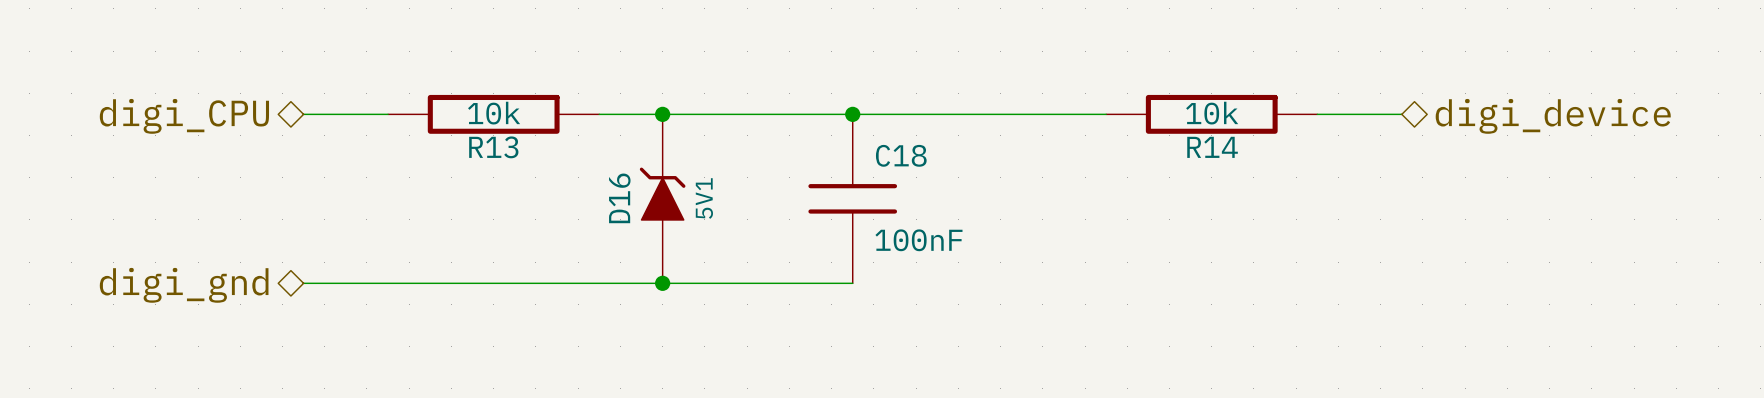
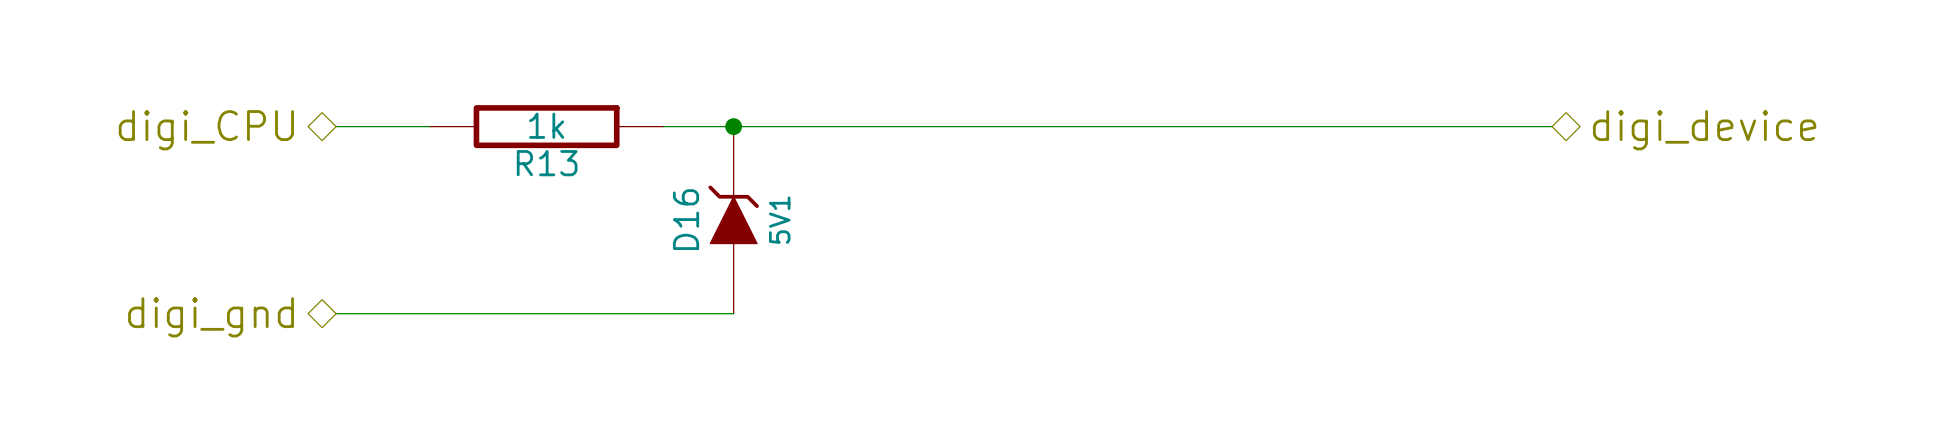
R13 value: 10k (494, 113) -> 1k (546, 125)
junction: (852, 114) -> none
wire: none -> (1224, 126) (1458, 126)
R14: 10k (1211, 114) -> none
C18: 100nF (852, 198) -> none
wire: (662, 283) (852, 283) -> none
junction: (662, 283) -> none

